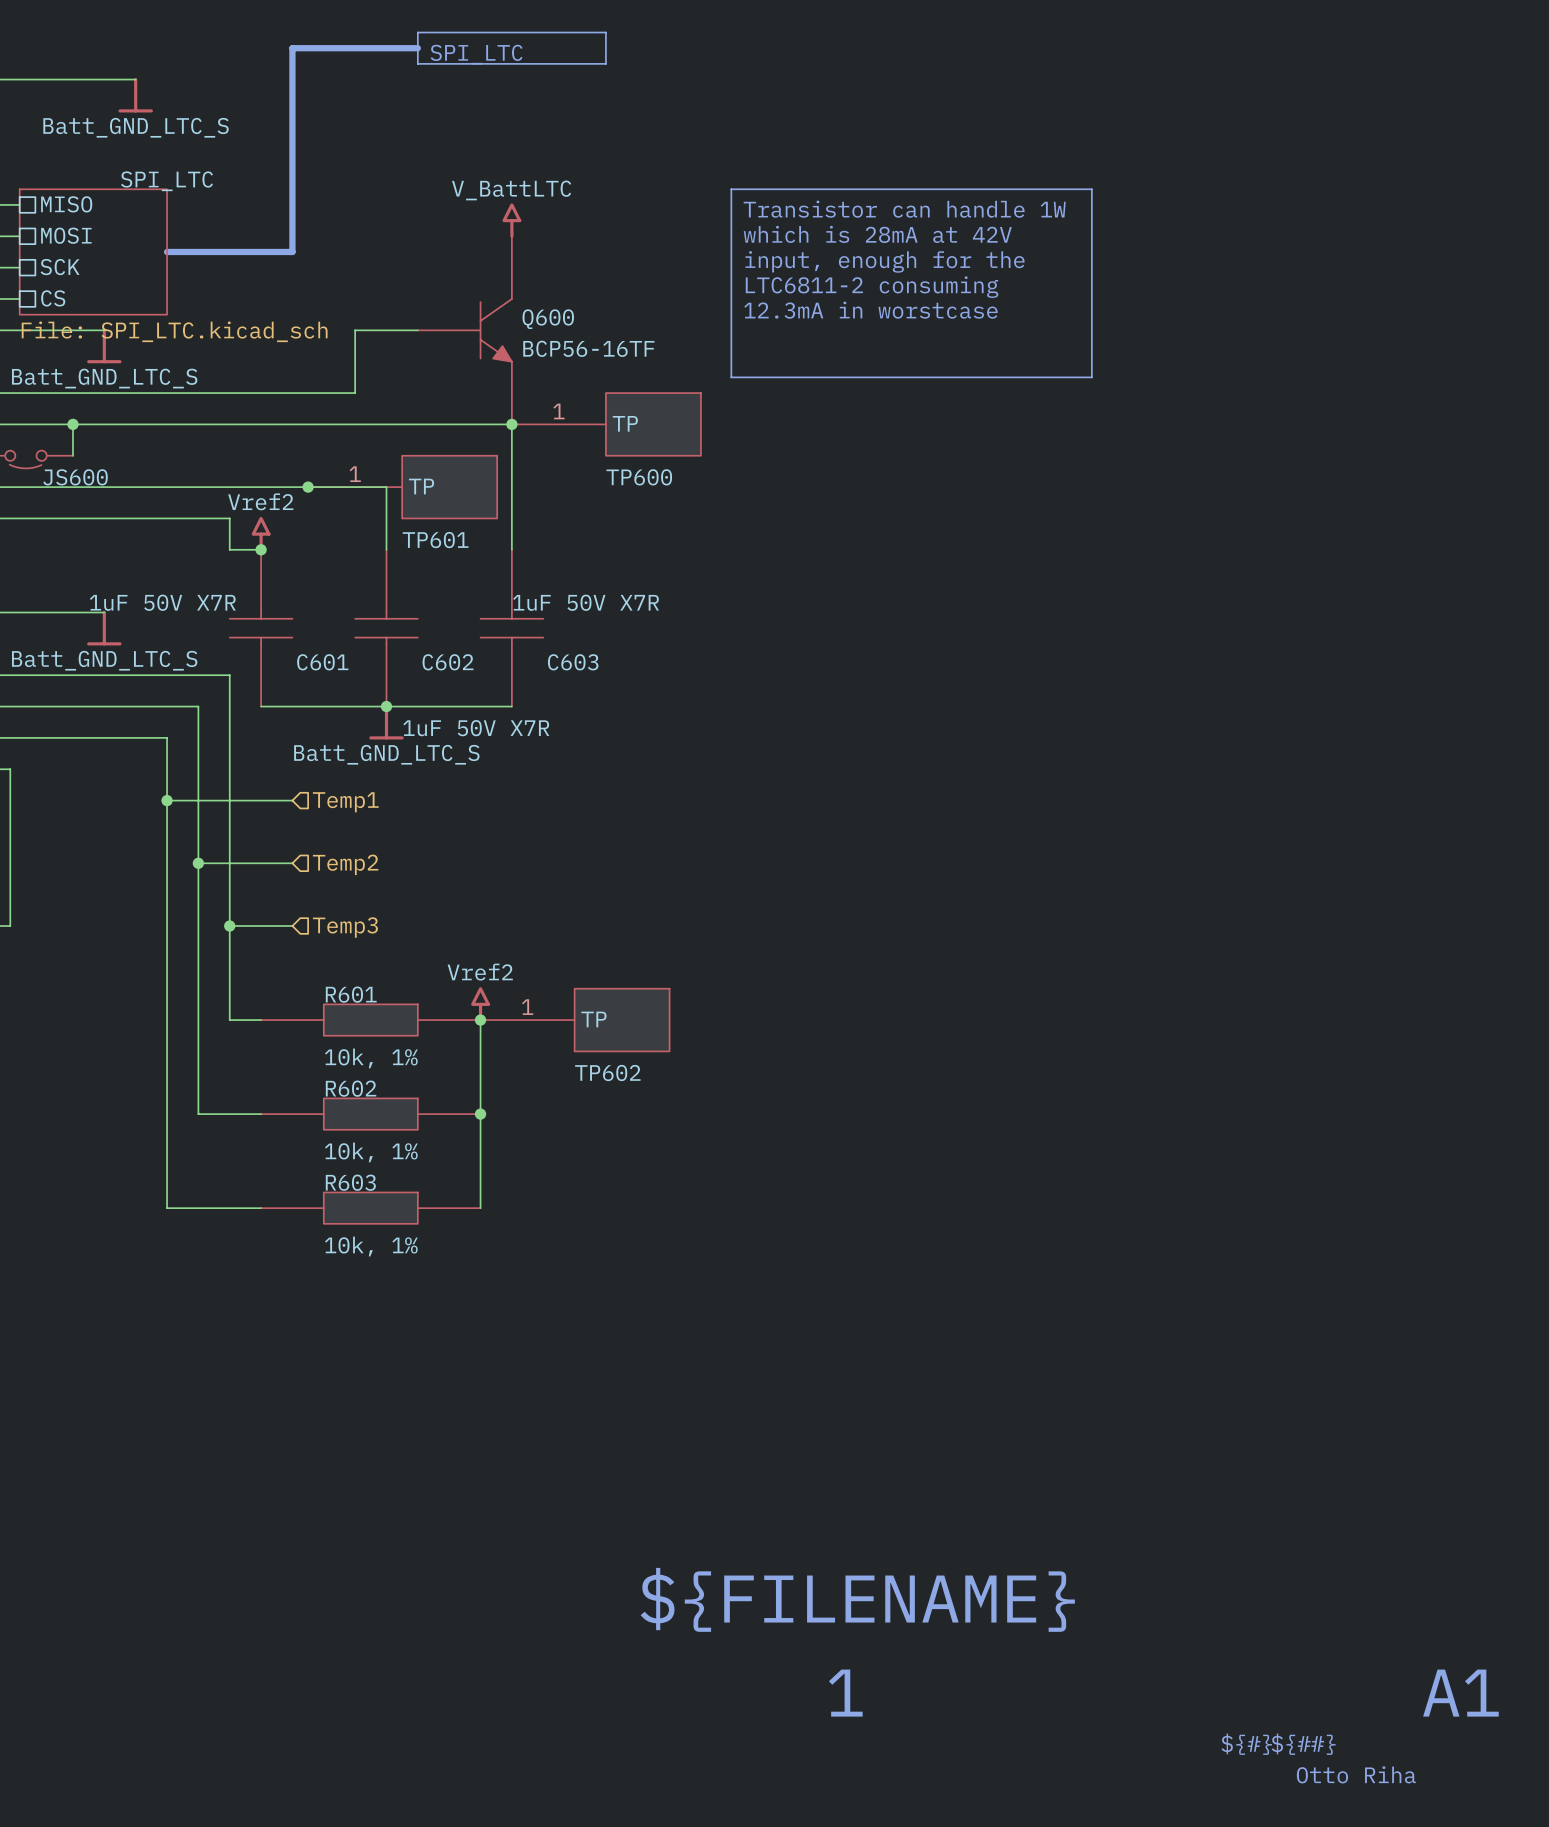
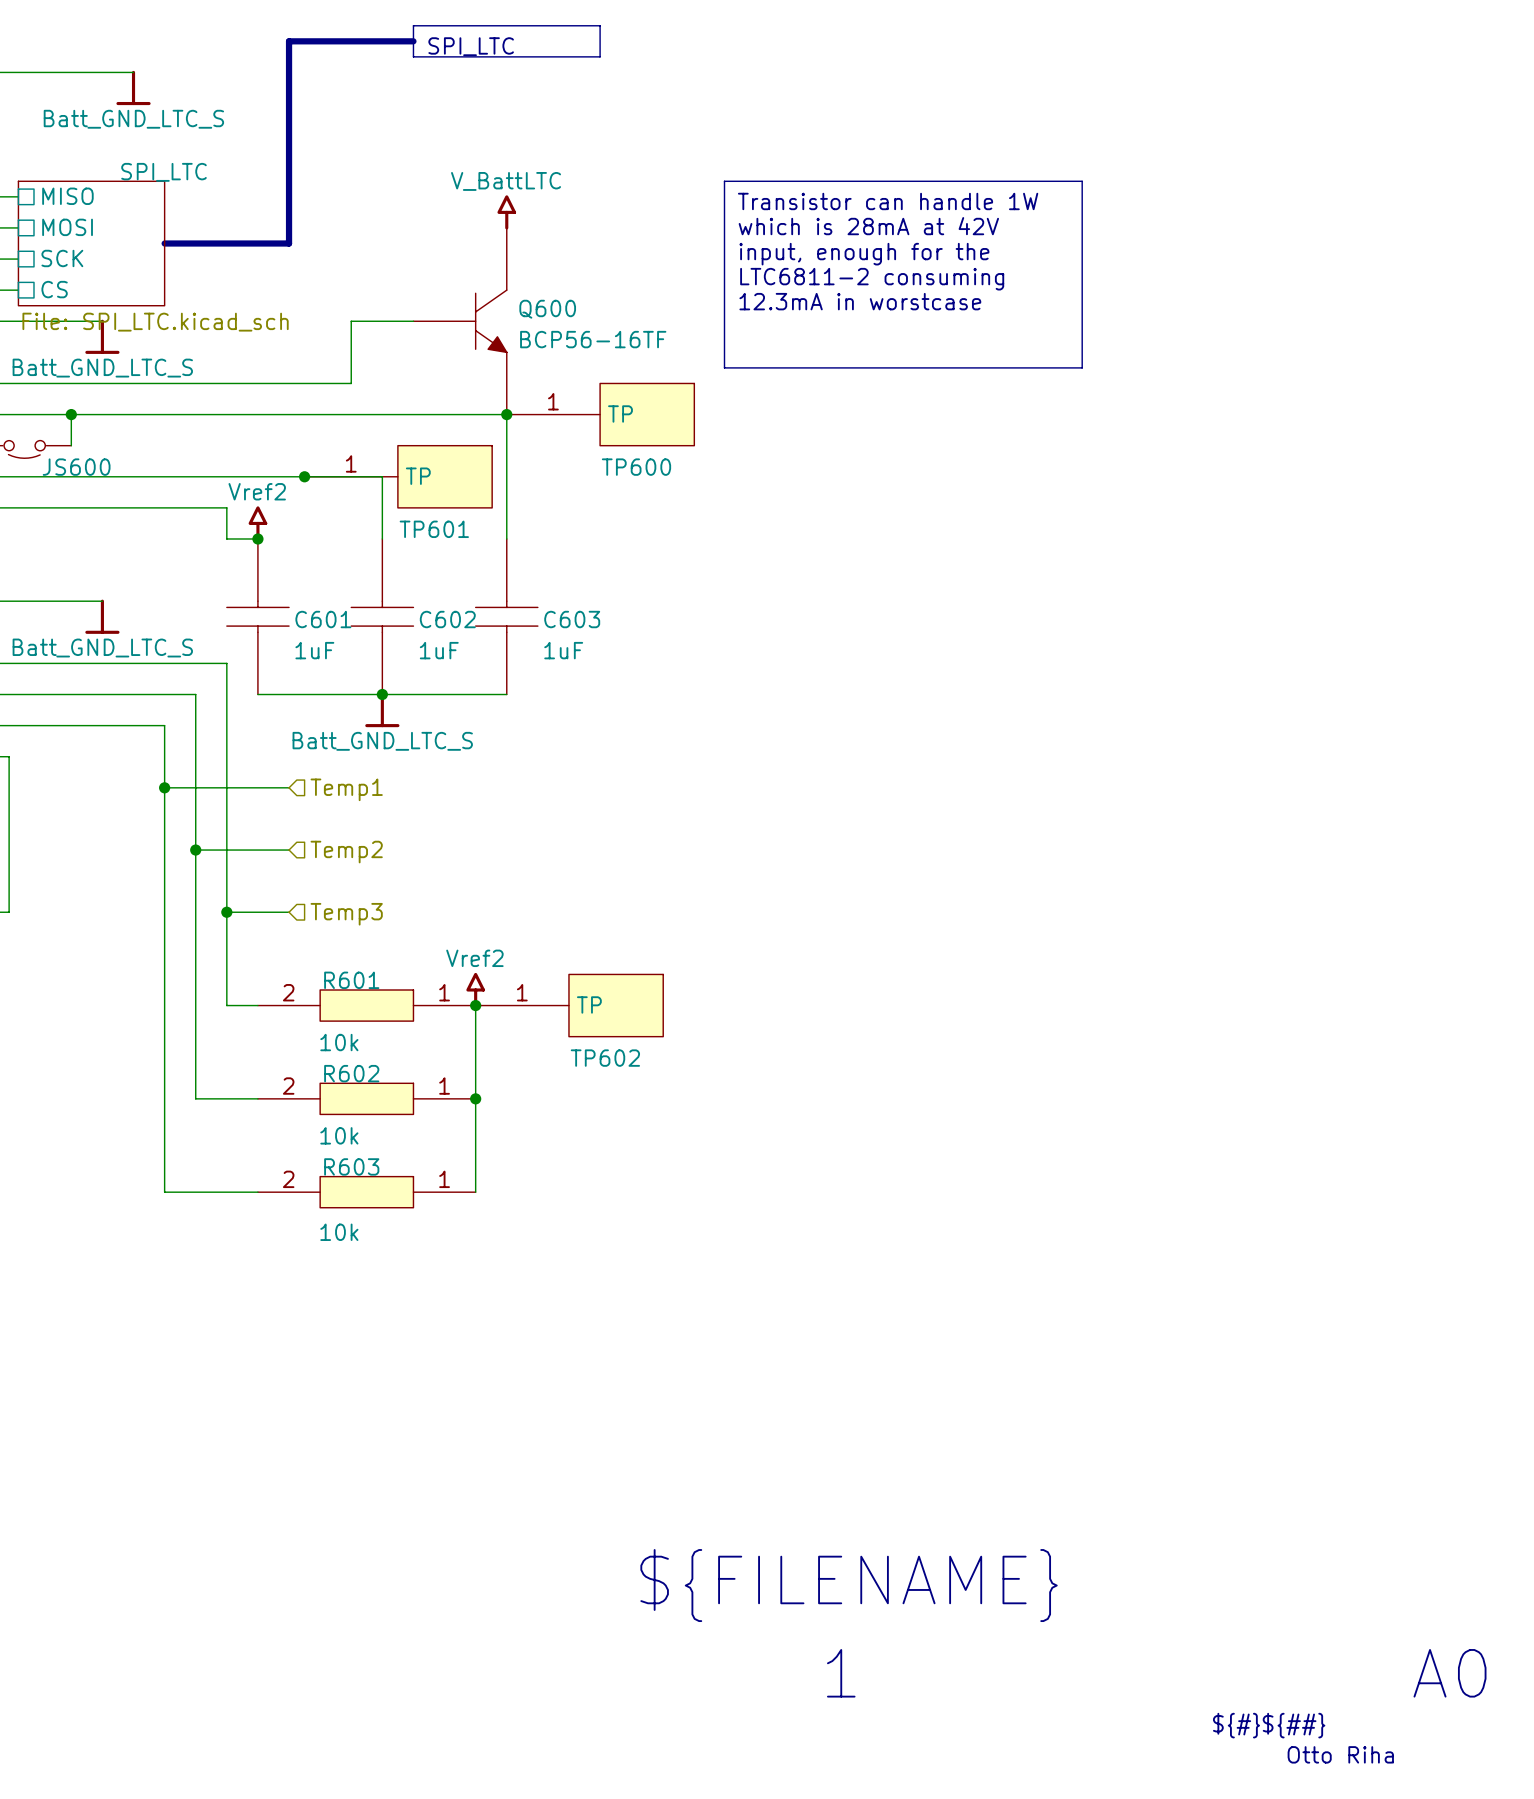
C601 value: 1uF 50V X7R (162, 602) -> none
C603 value: 1uF 50V X7R (586, 602) -> none
C601 text: none -> 1uF (314, 650)
C601 name position: C601 (322, 662) -> C601 (323, 619)
C602 text: none -> 1uF (439, 650)
C602 name position: C602 (448, 662) -> C602 (447, 619)
C603 text: none -> 1uF (563, 650)
C603 name position: C603 (573, 662) -> C603 (572, 619)
C602 value: 1uF 50V X7R (476, 728) -> none
R601 pin number: none -> 2 (288, 992)
R601 pin number: none -> 1 (444, 992)
R601 text: 10k, 1% (371, 1058) -> 10k (339, 1042)
R602 pin number: none -> 2 (288, 1086)
R602 pin number: none -> 1 (444, 1086)
R602 text: 10k, 1% (371, 1152) -> 10k (339, 1135)
R603 pin number: none -> 2 (288, 1179)
R603 pin number: none -> 1 (444, 1179)
R603 text: 10k, 1% (371, 1246) -> 10k (339, 1232)
text: A1 (1460, 1693) -> A0 (1450, 1673)

